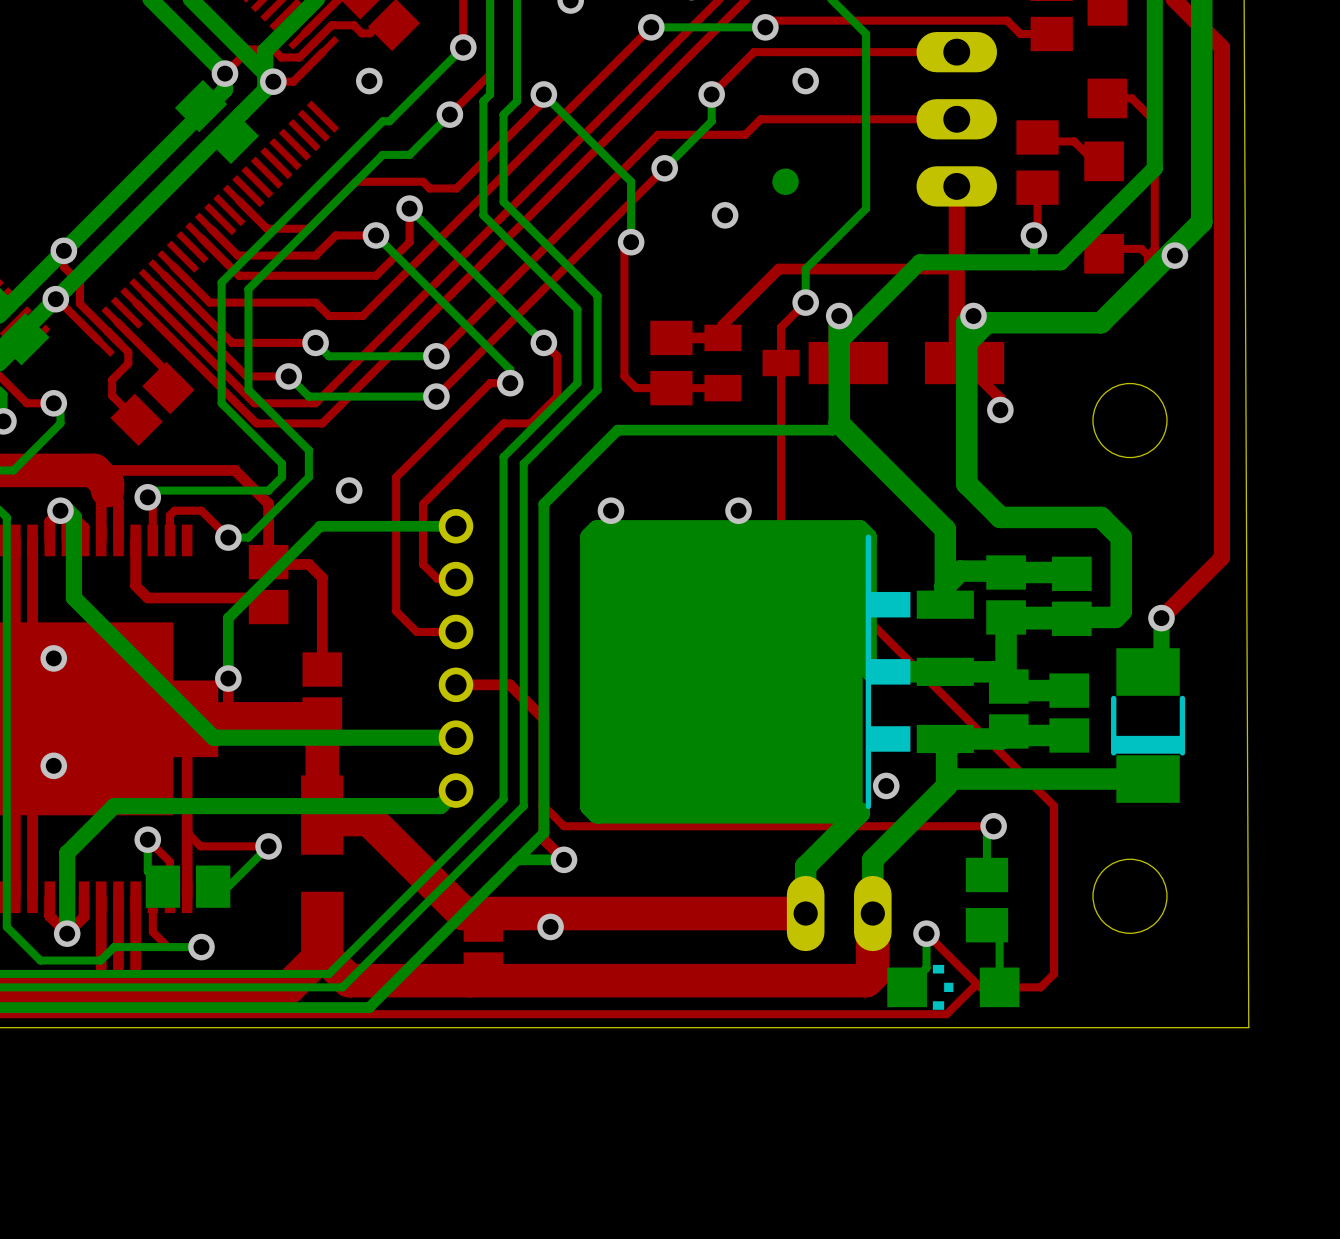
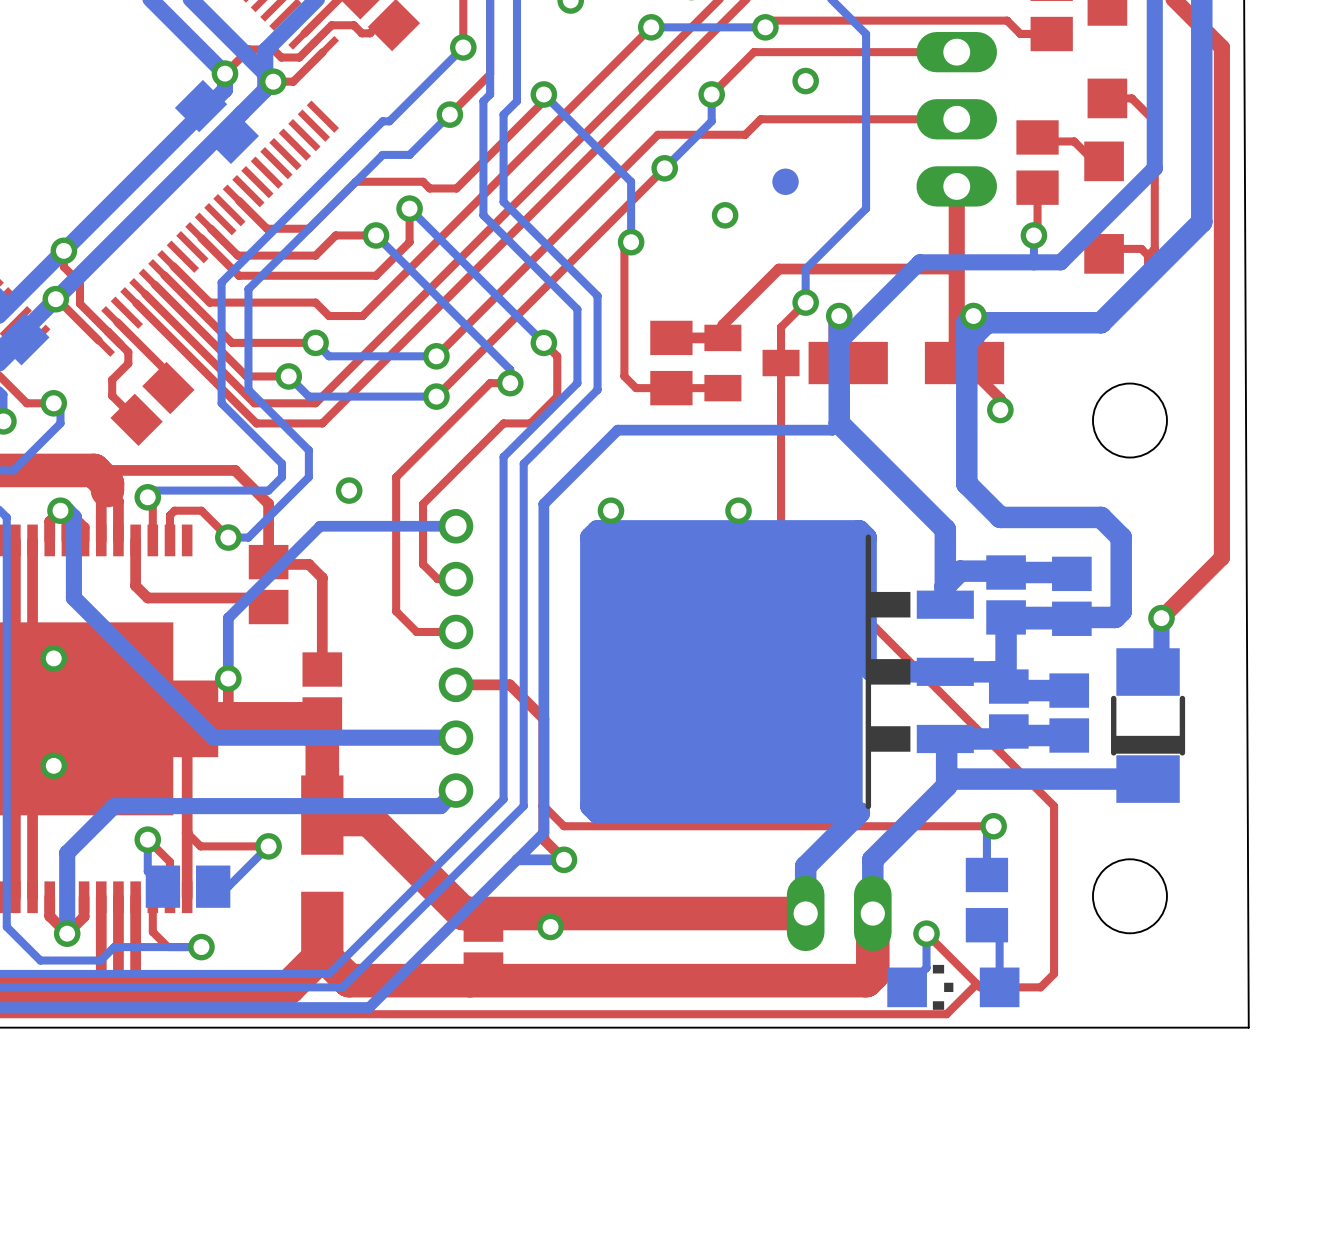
via: (369, 81) -> none
via: (1174, 255) -> none
via: (886, 785) -> none

